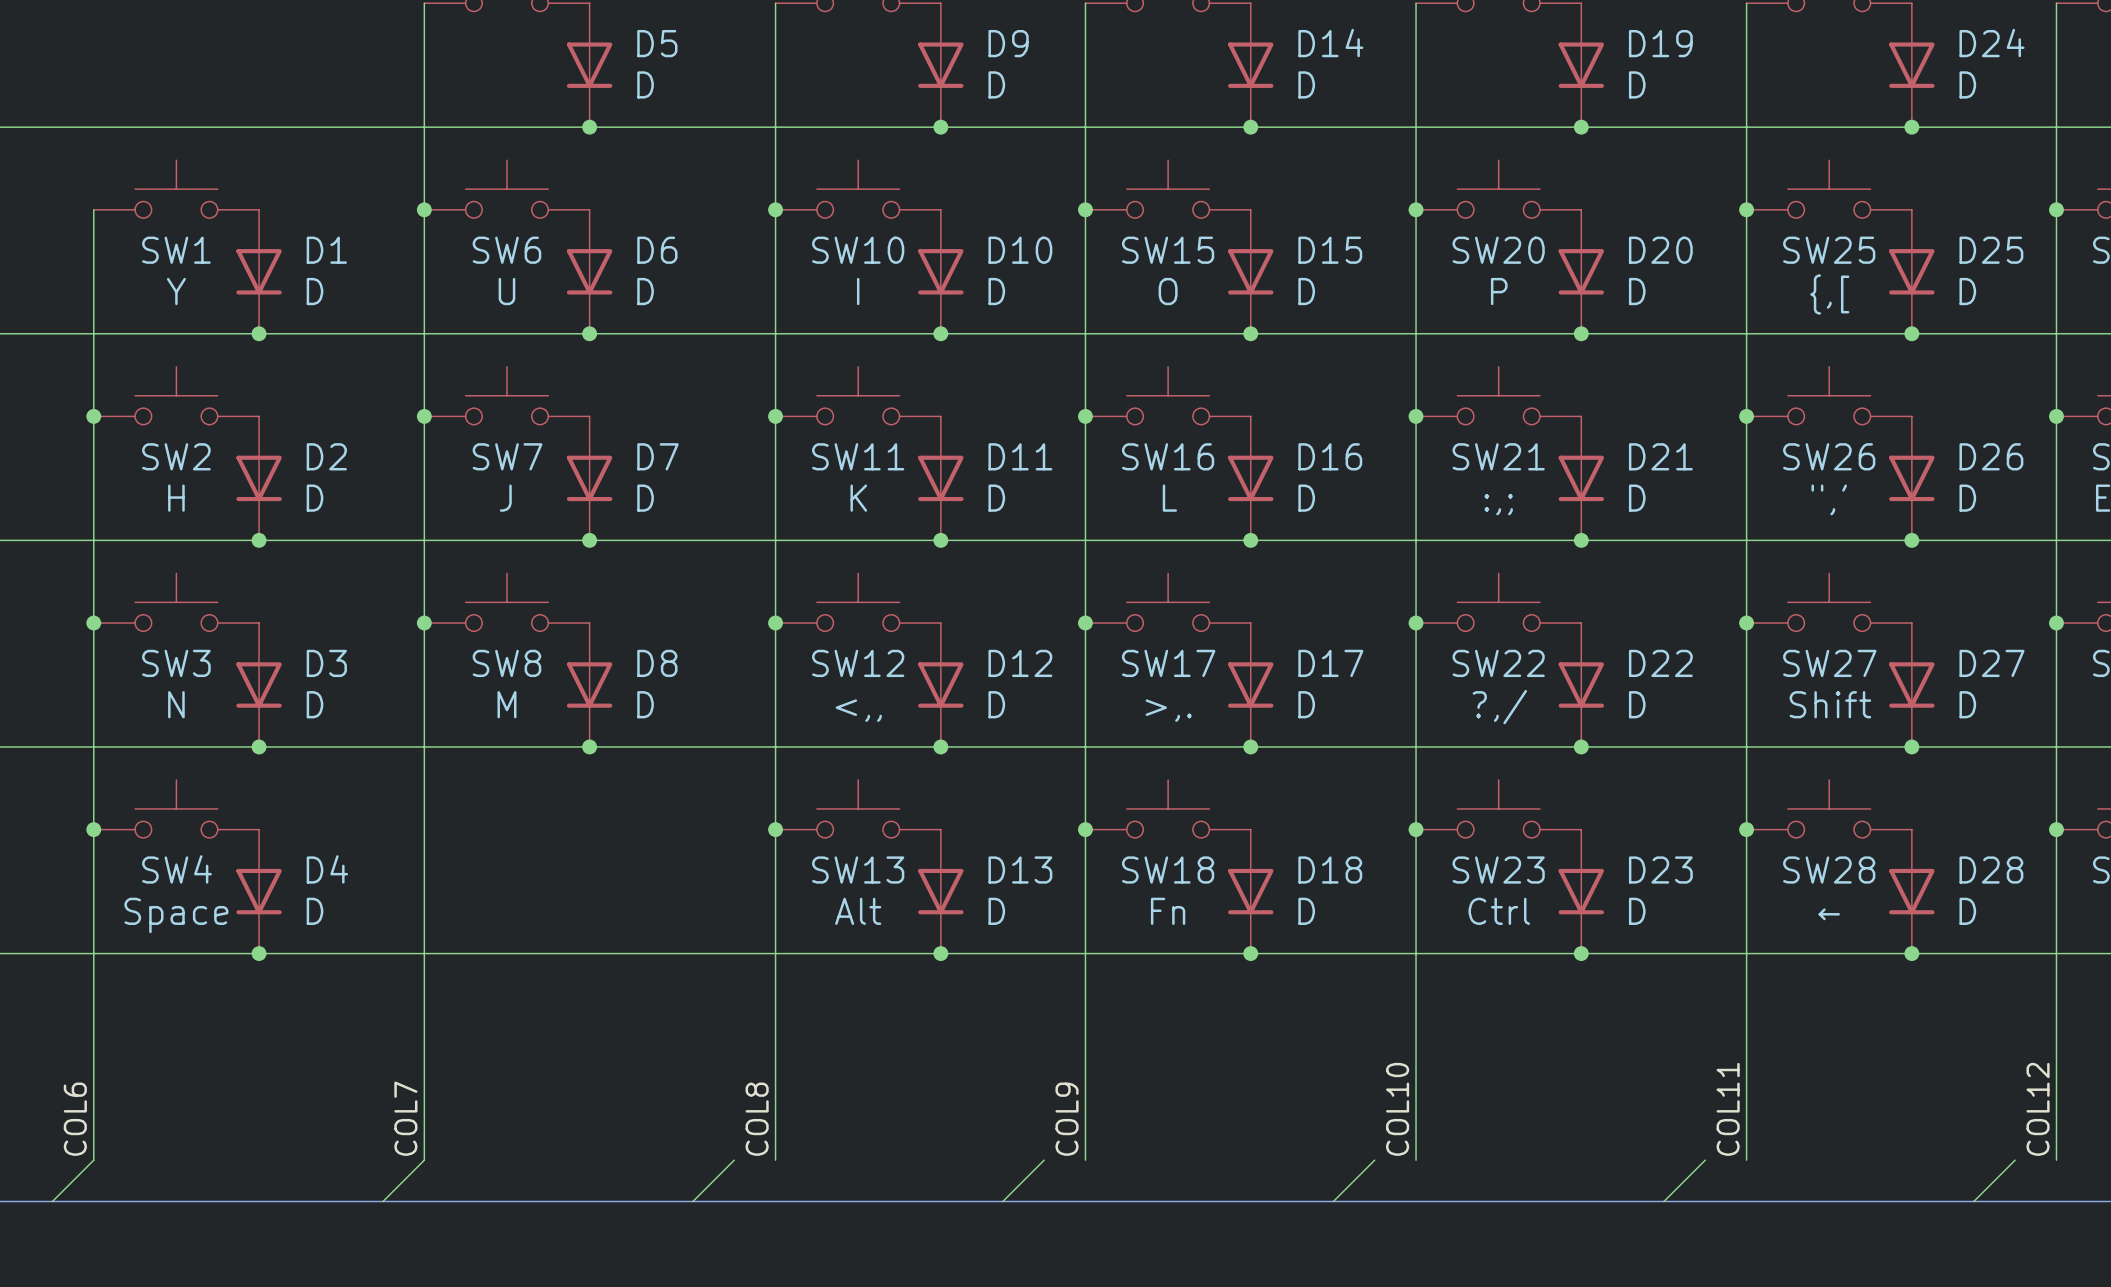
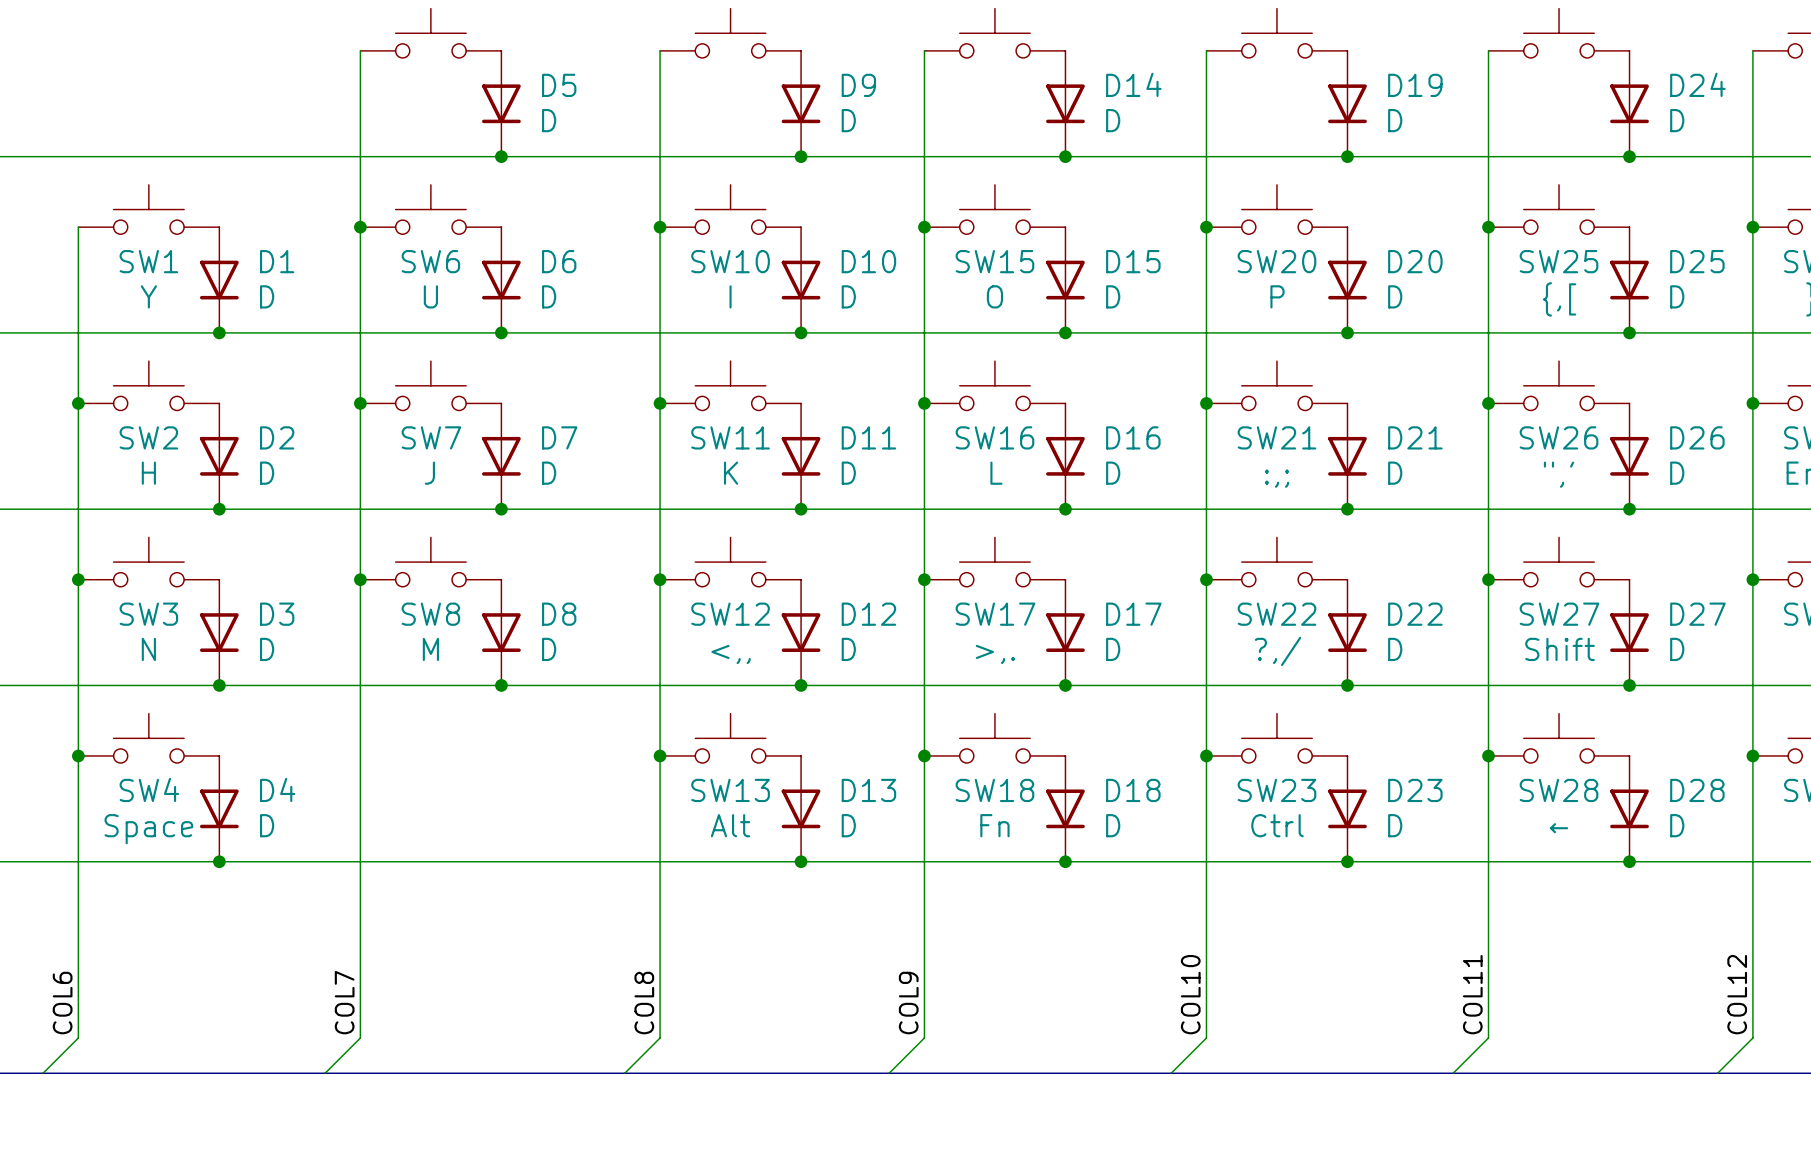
wire: (734, 1160) (692, 1201) -> (660, 1038) (624, 1073)
wire: (1044, 1160) (1002, 1201) -> (924, 1038) (889, 1073)
wire: (1374, 1160) (1333, 1201) -> (1206, 1038) (1171, 1073)
wire: (1705, 1160) (1663, 1201) -> (1488, 1038) (1453, 1073)
wire: (2015, 1160) (1973, 1201) -> (1752, 1038) (1717, 1073)

